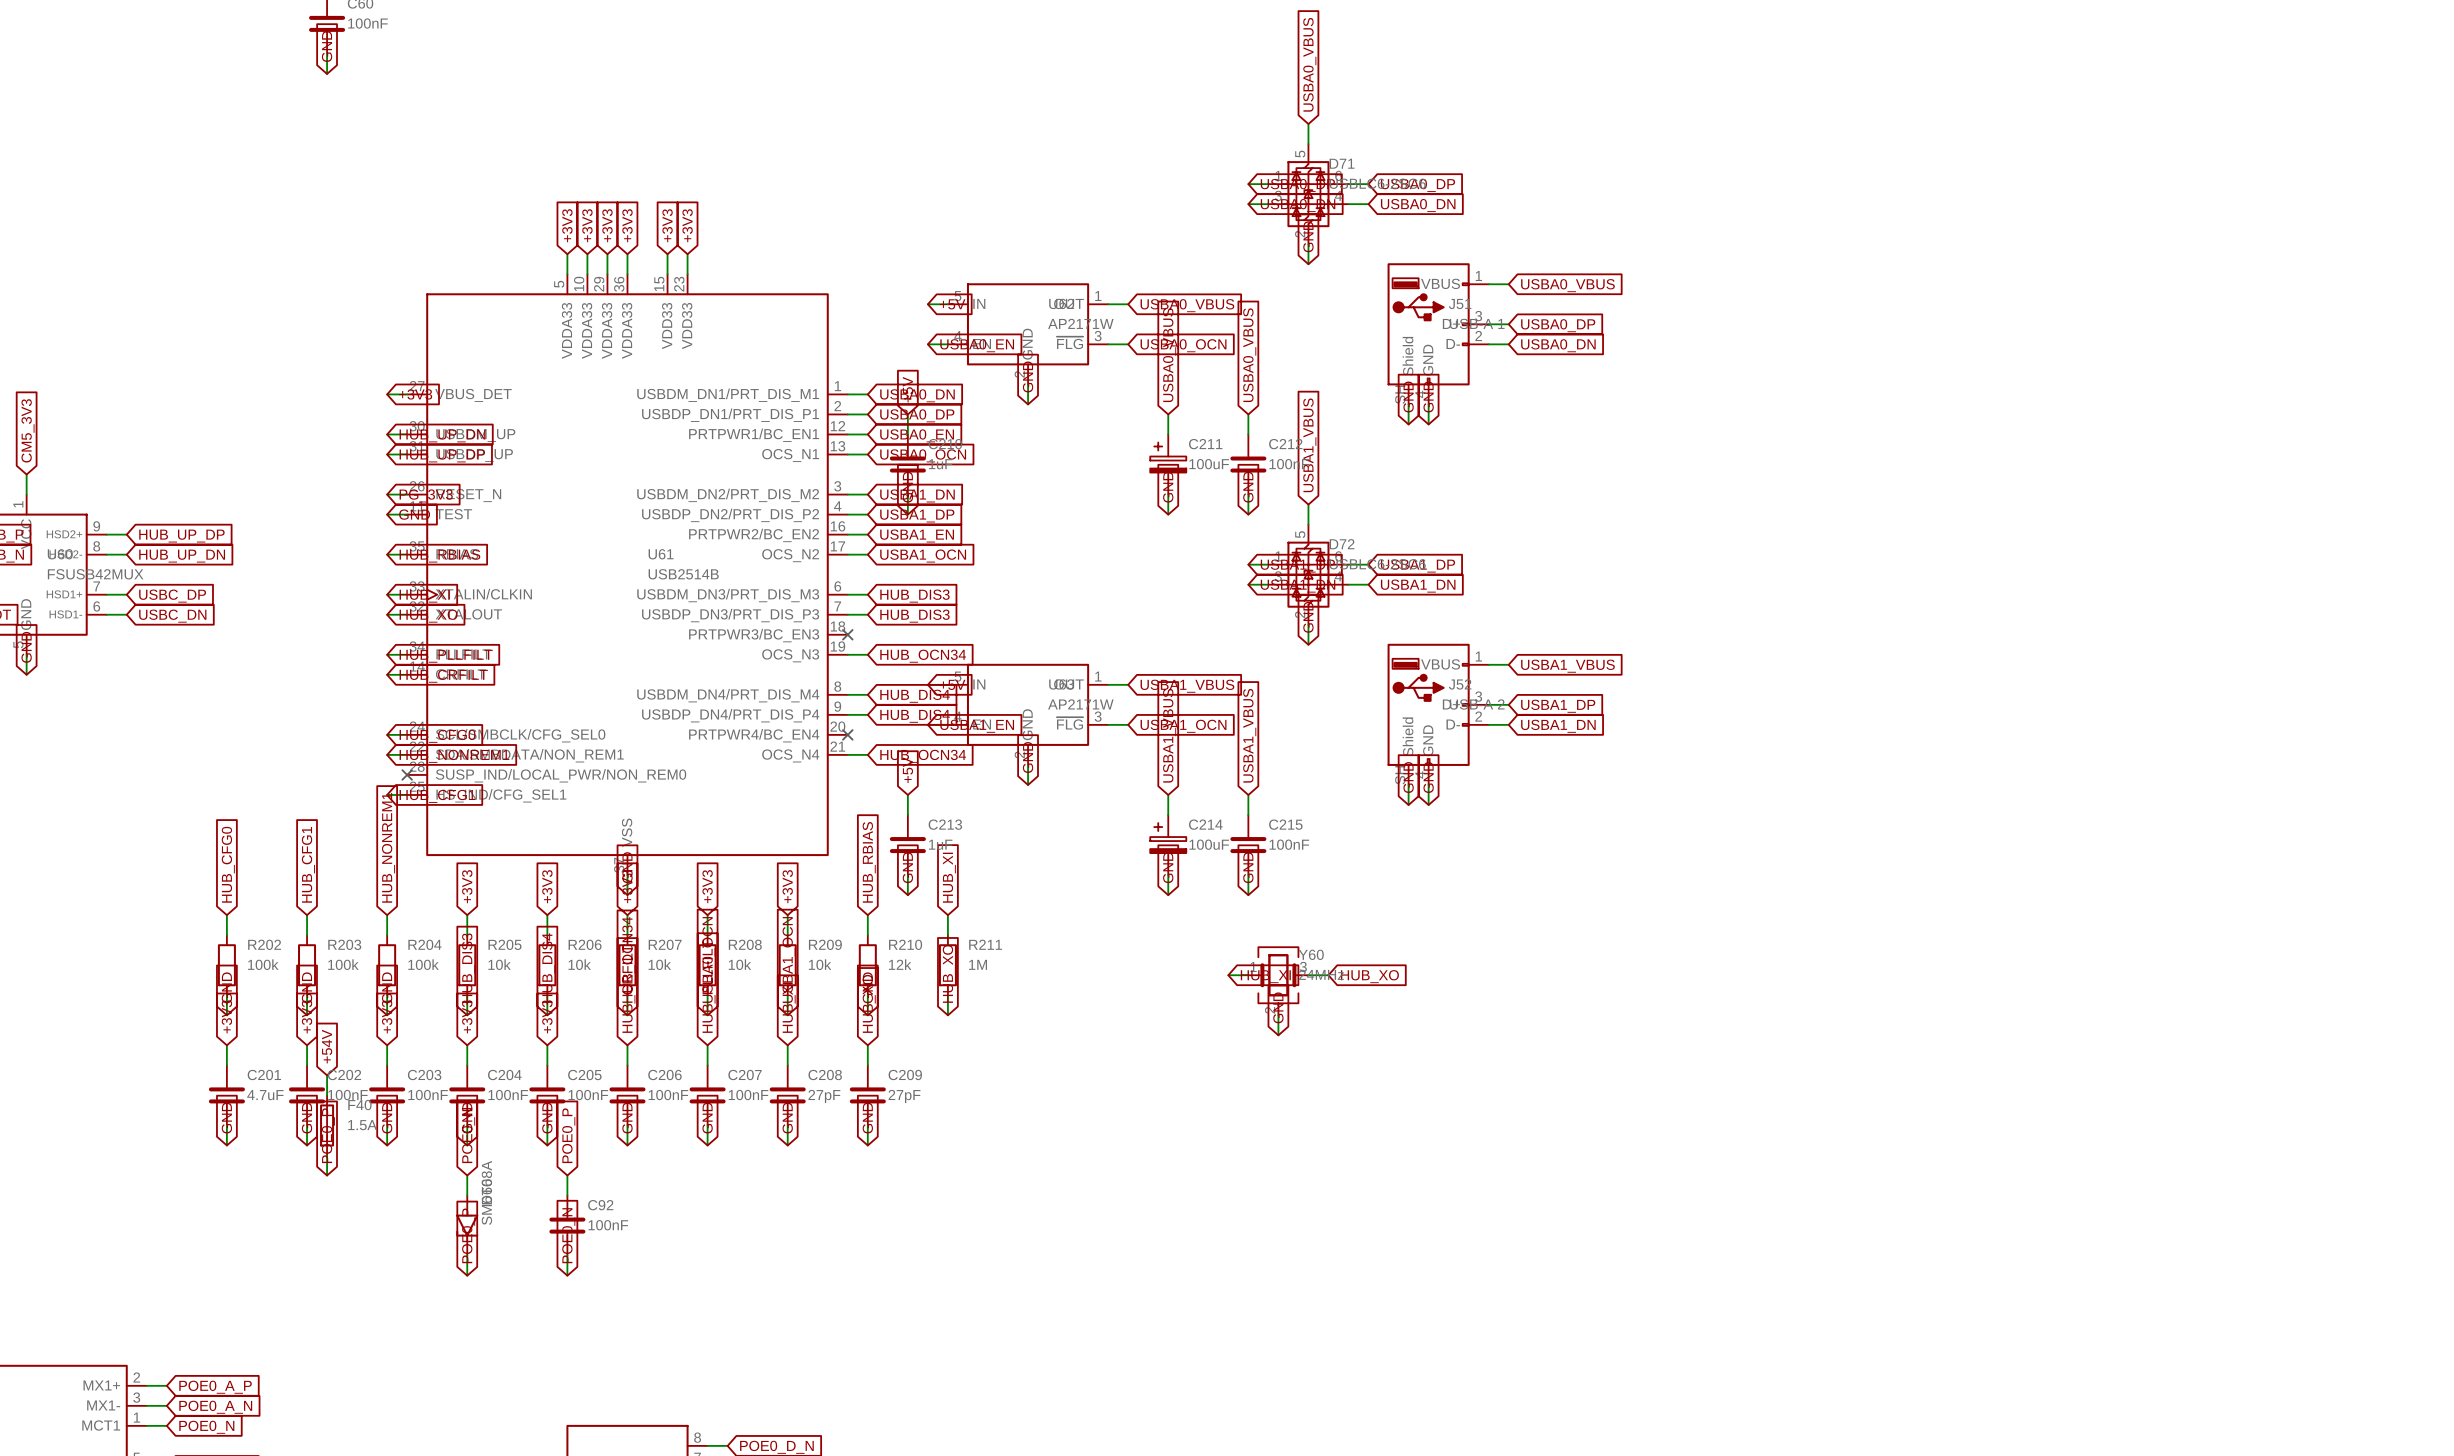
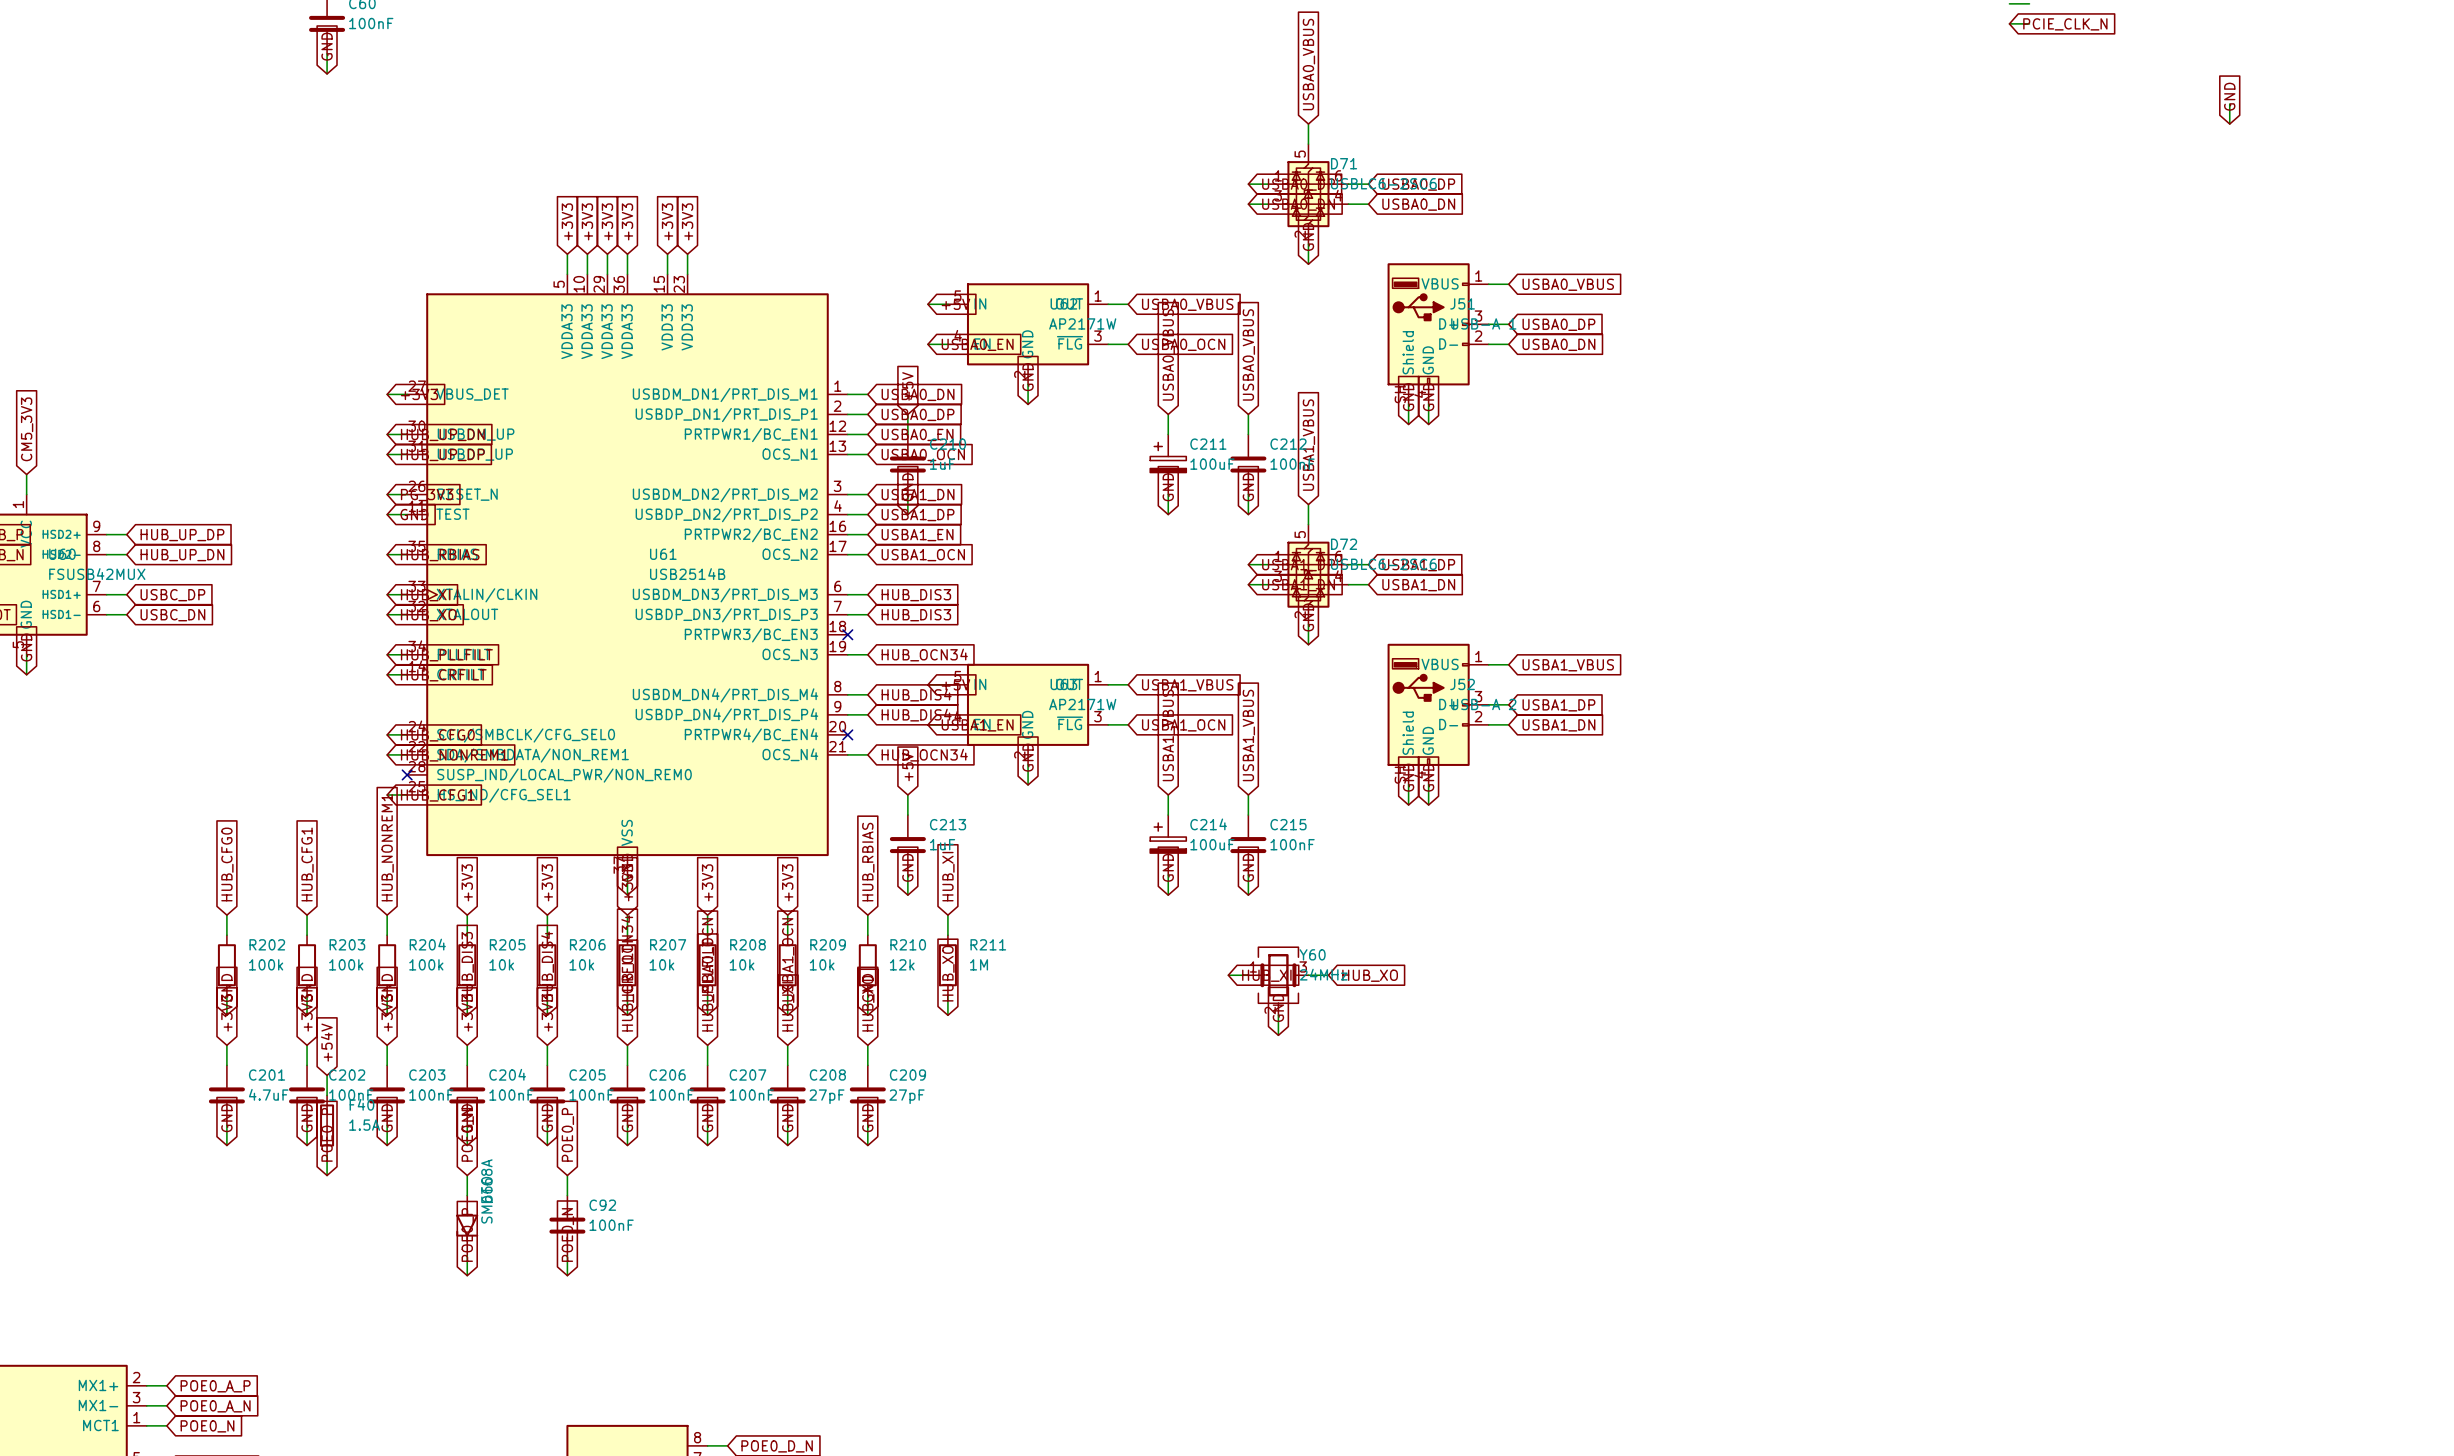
wire: none -> (2009, 3) (2029, 3)
wire: none -> (2009, 23) (2029, 23)
global label: none -> PCIE_CLK_N (2065, 24)
global label: none -> GND (2229, 96)
wire: none -> (2229, 104) (2229, 124)

